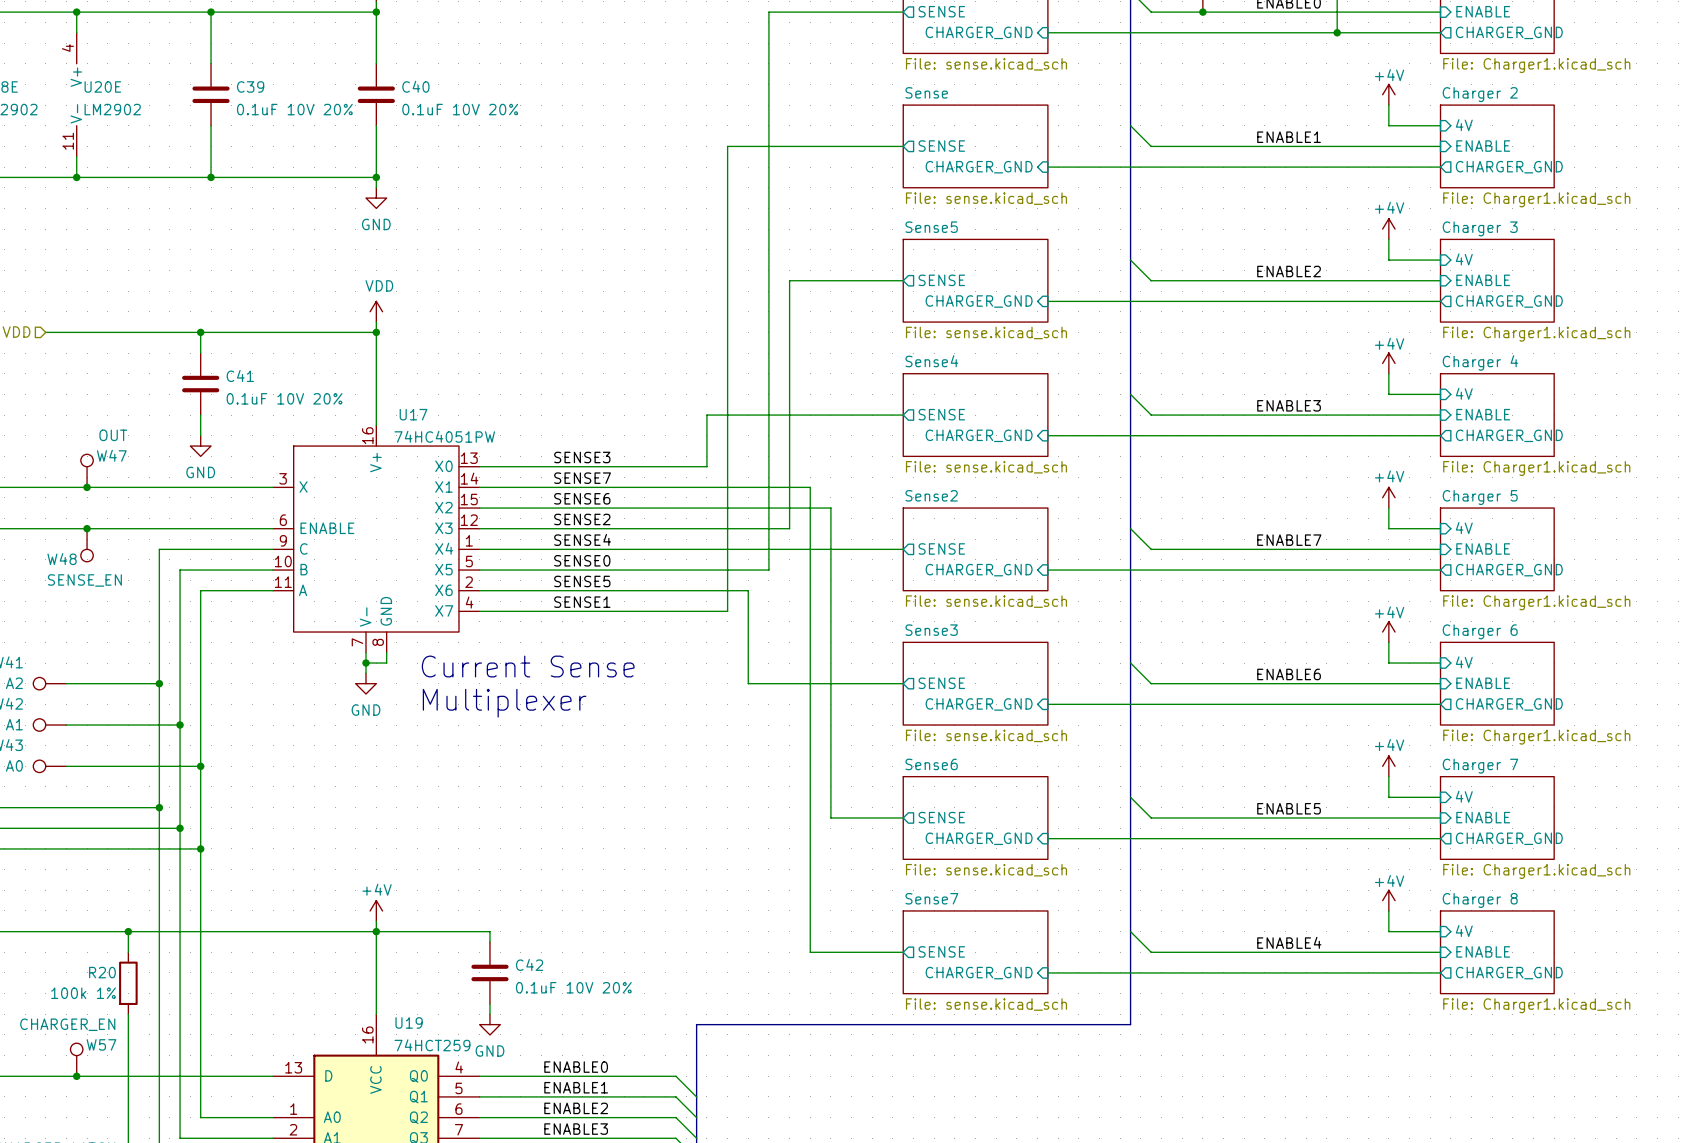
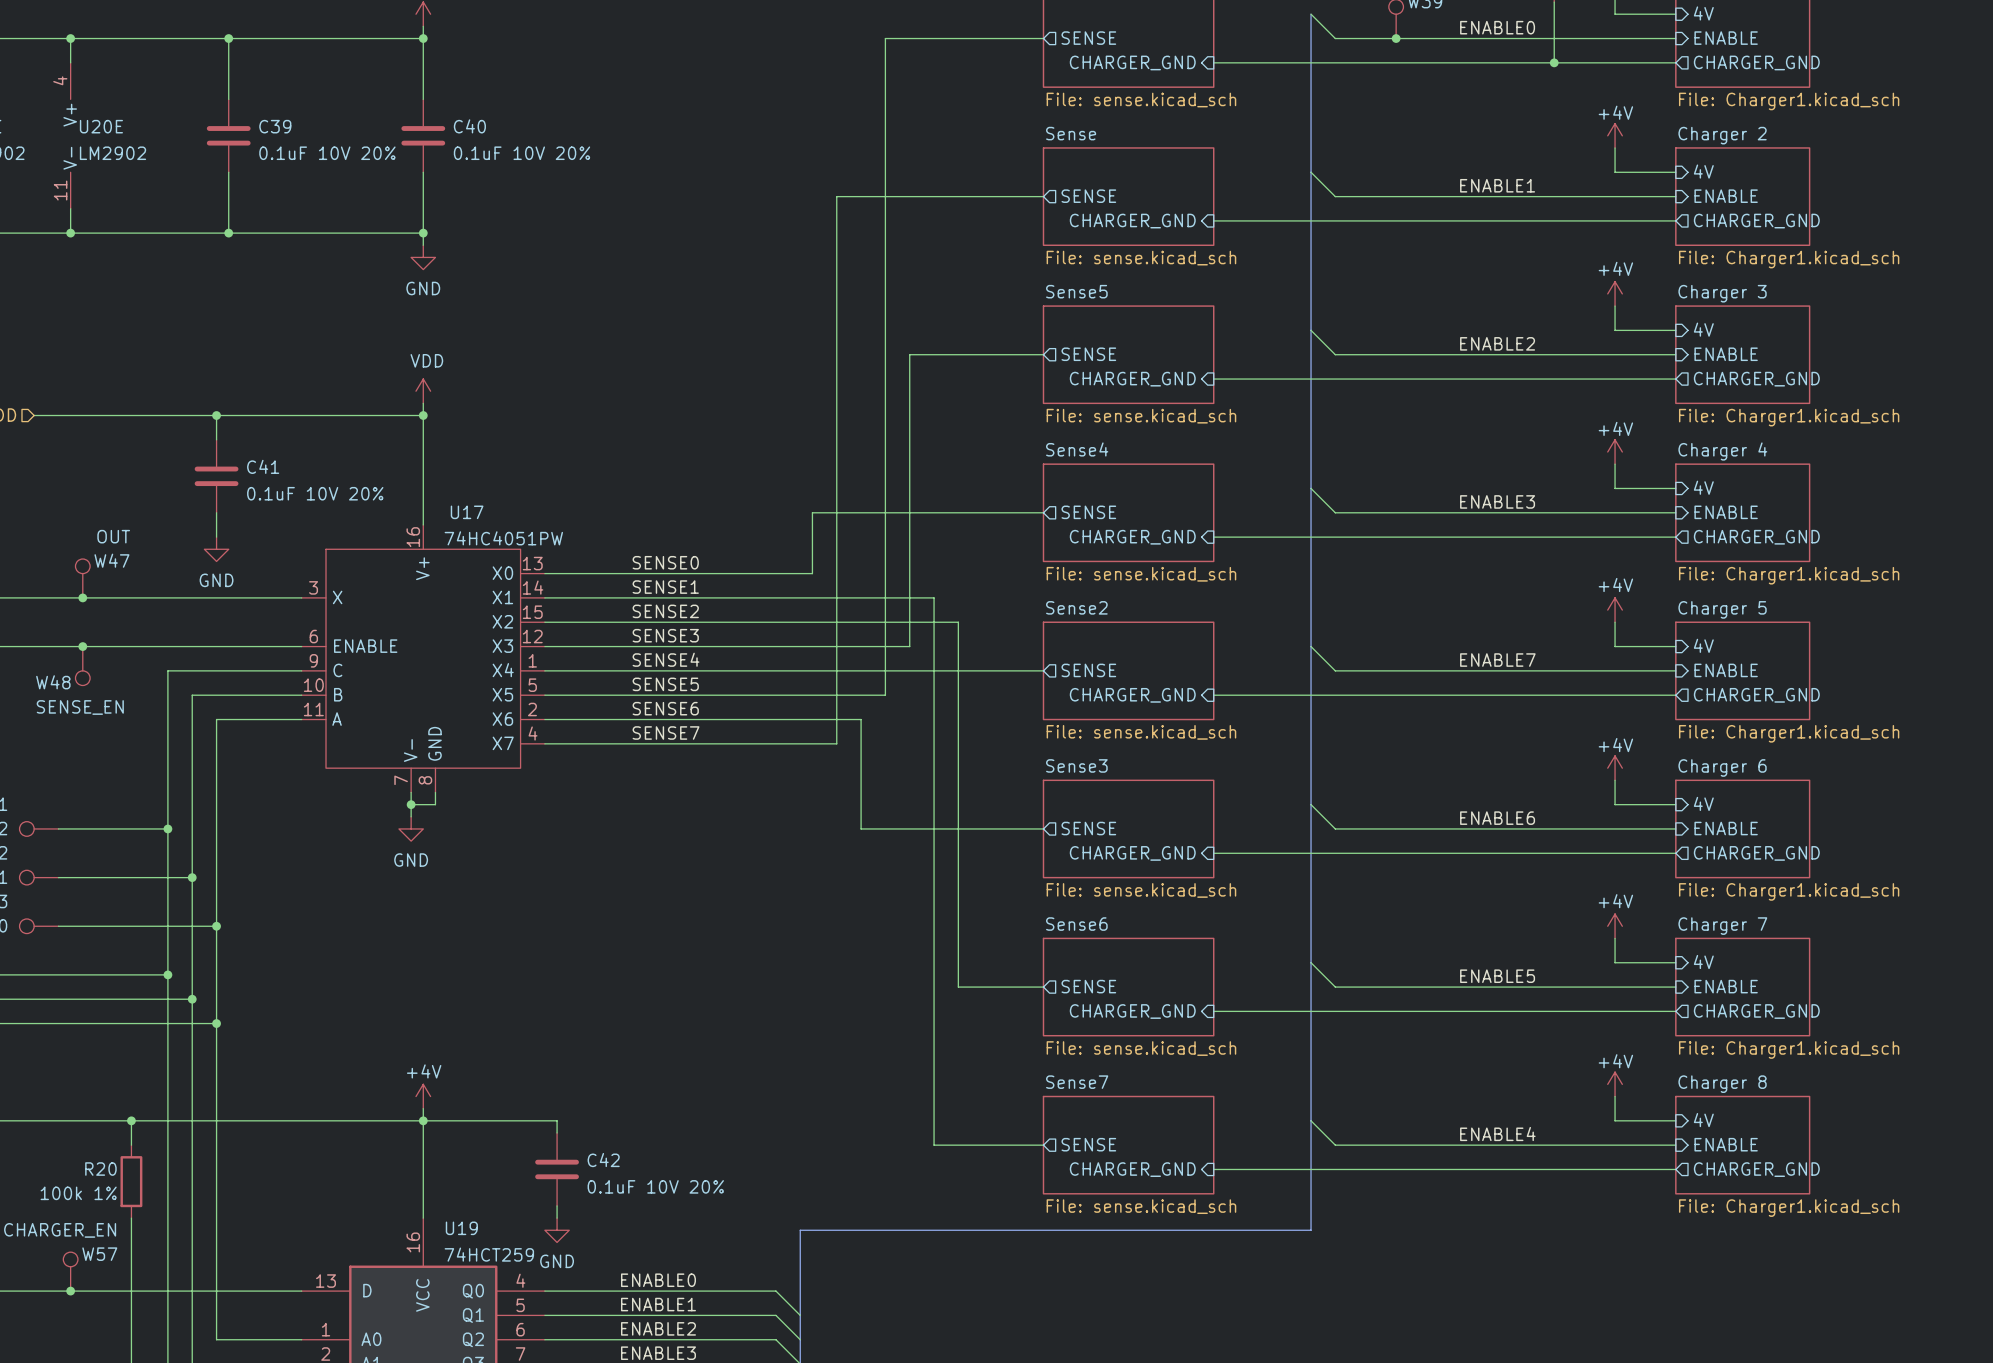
label: SENSE3 (582, 457) -> SENSE0 (665, 562)
label: SENSE7 (582, 478) -> SENSE1 (665, 587)
label: SENSE6 (582, 498) -> SENSE2 (665, 611)
label: SENSE2 (582, 519) -> SENSE3 (665, 635)
label: SENSE0 (582, 560) -> SENSE5 (665, 684)
label: SENSE5 (582, 581) -> SENSE6 (665, 708)
label: SENSE1 (582, 602) -> SENSE7 (666, 733)
text: Current Sense (528, 666) -> none
text: Multiplexer (504, 703) -> none

